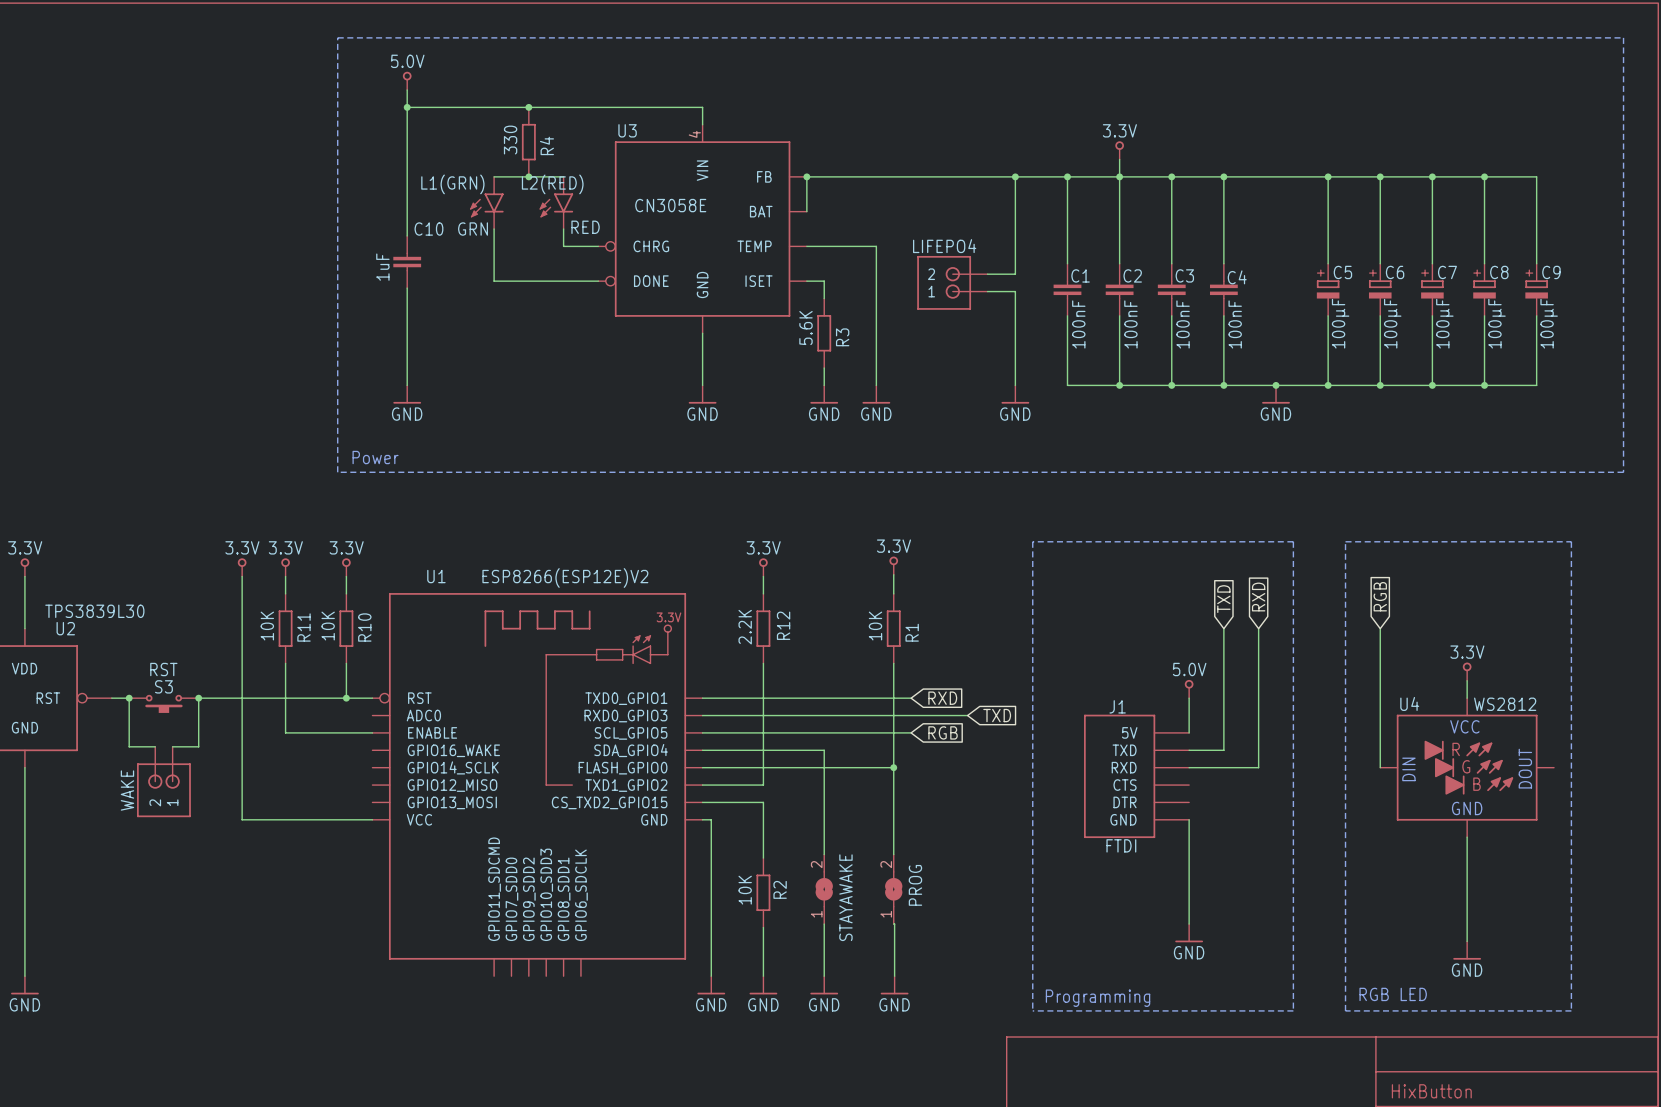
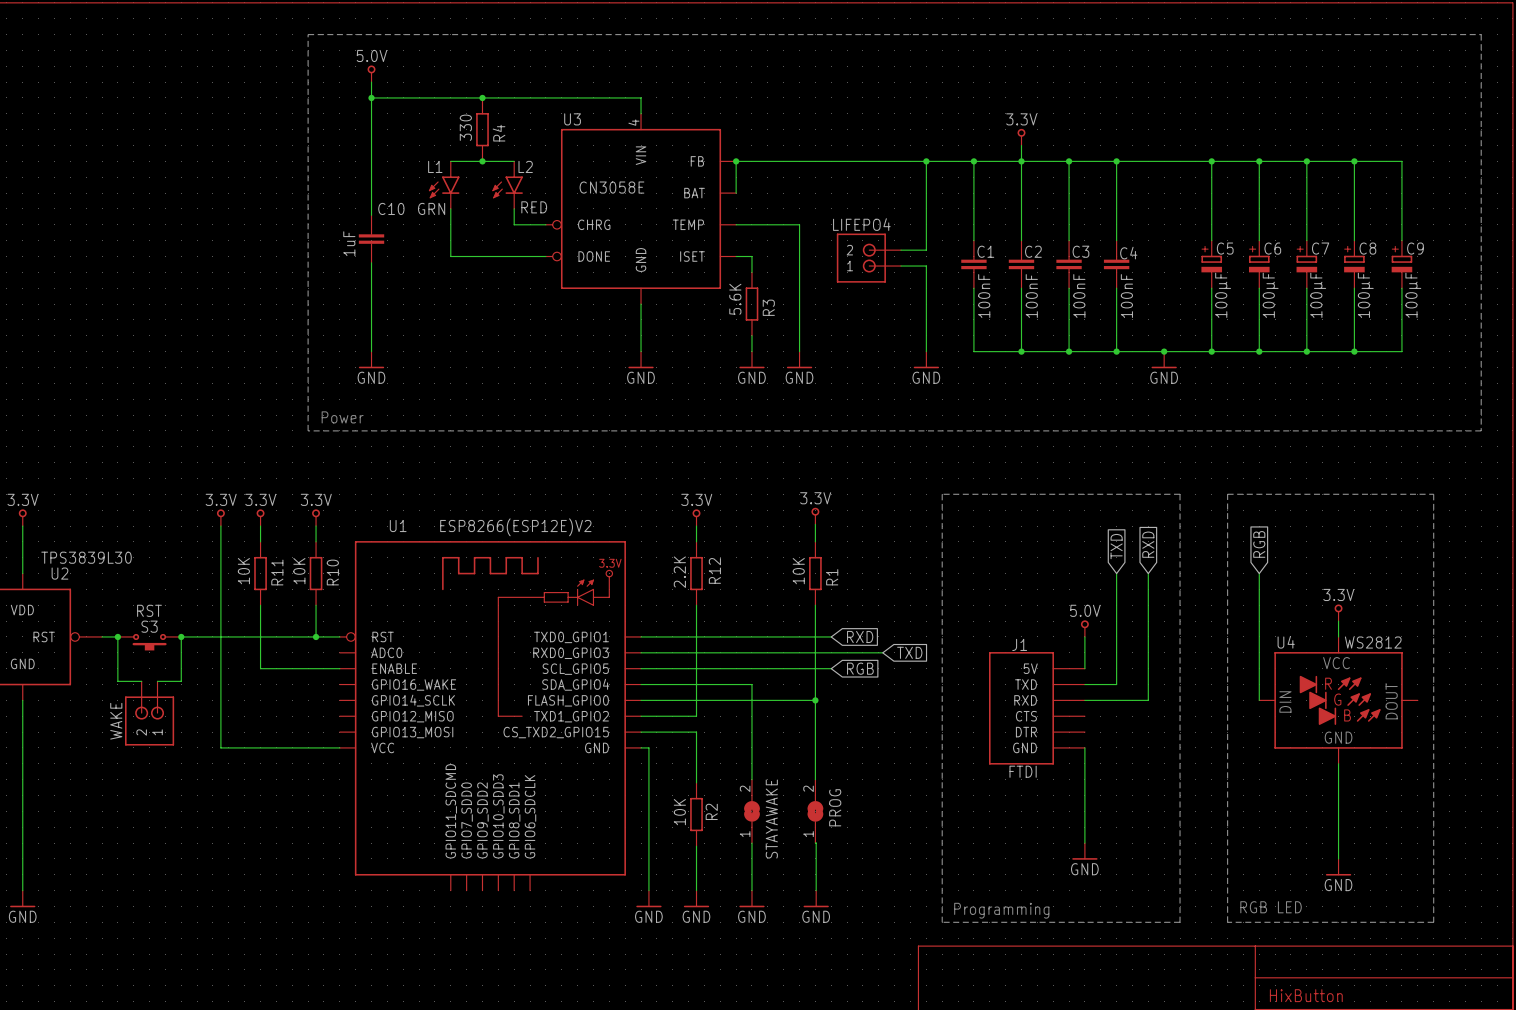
L1(GRN) name: L1(GRN) (452, 184) -> L1 (435, 166)
L2(RED) name: L2(RED) (552, 184) -> L2 (525, 166)

